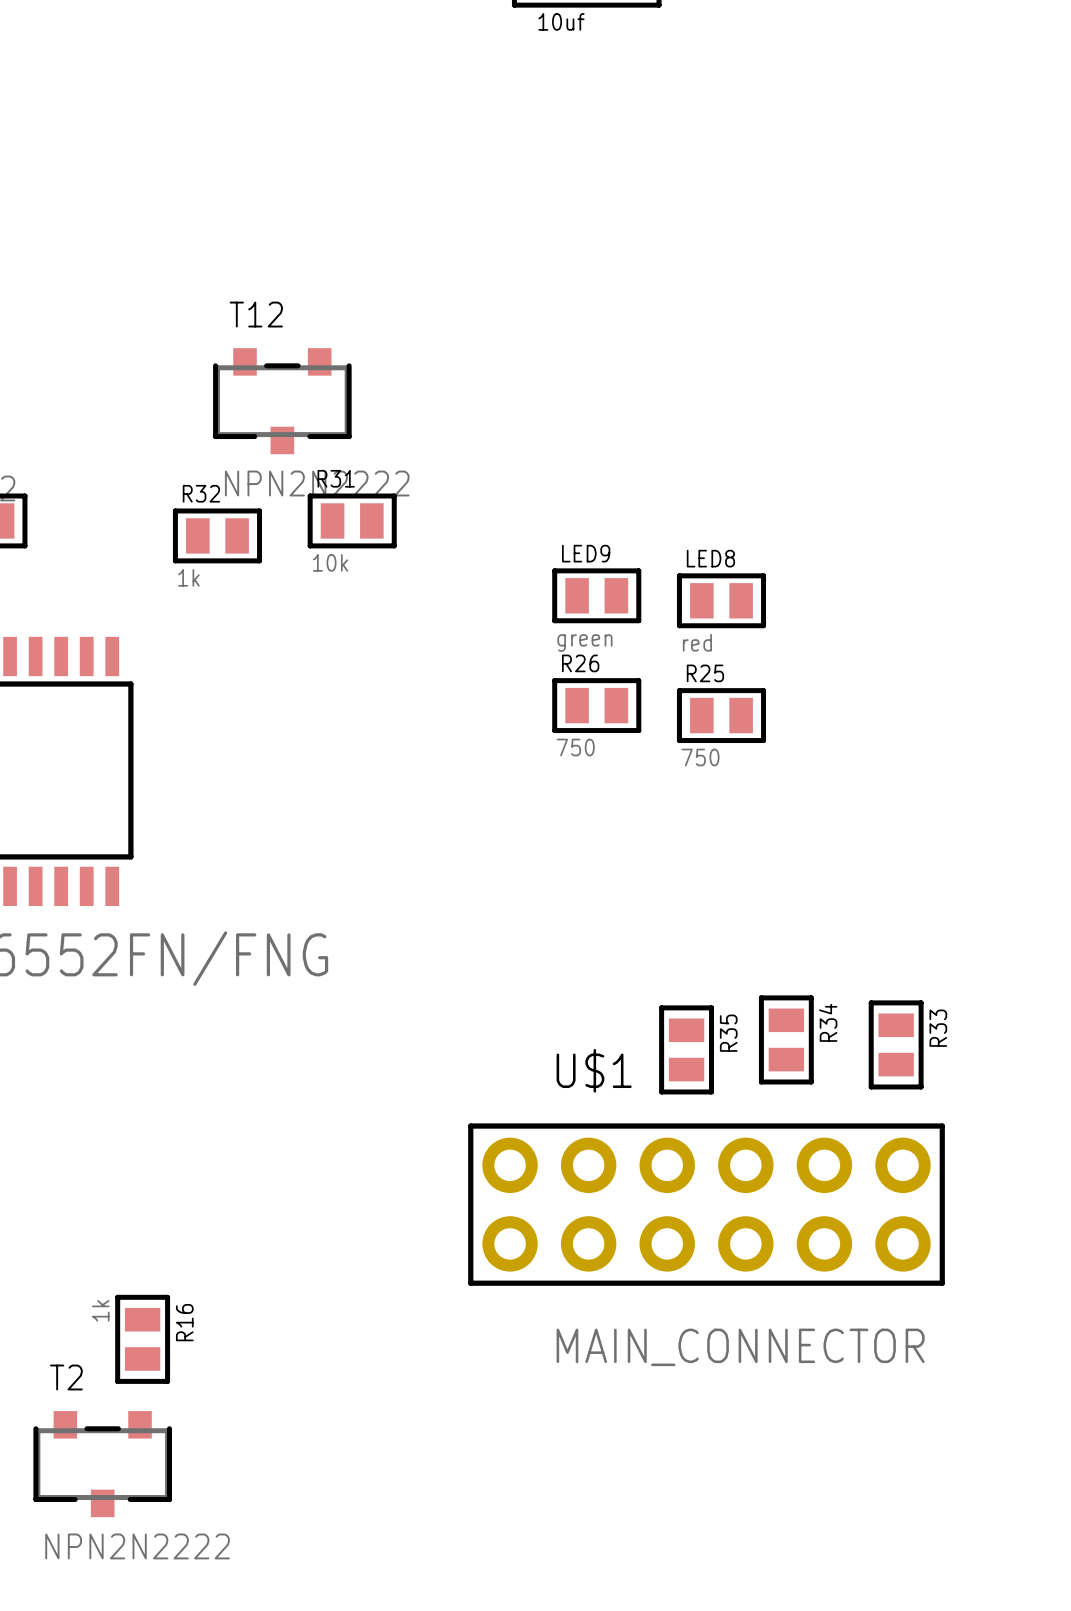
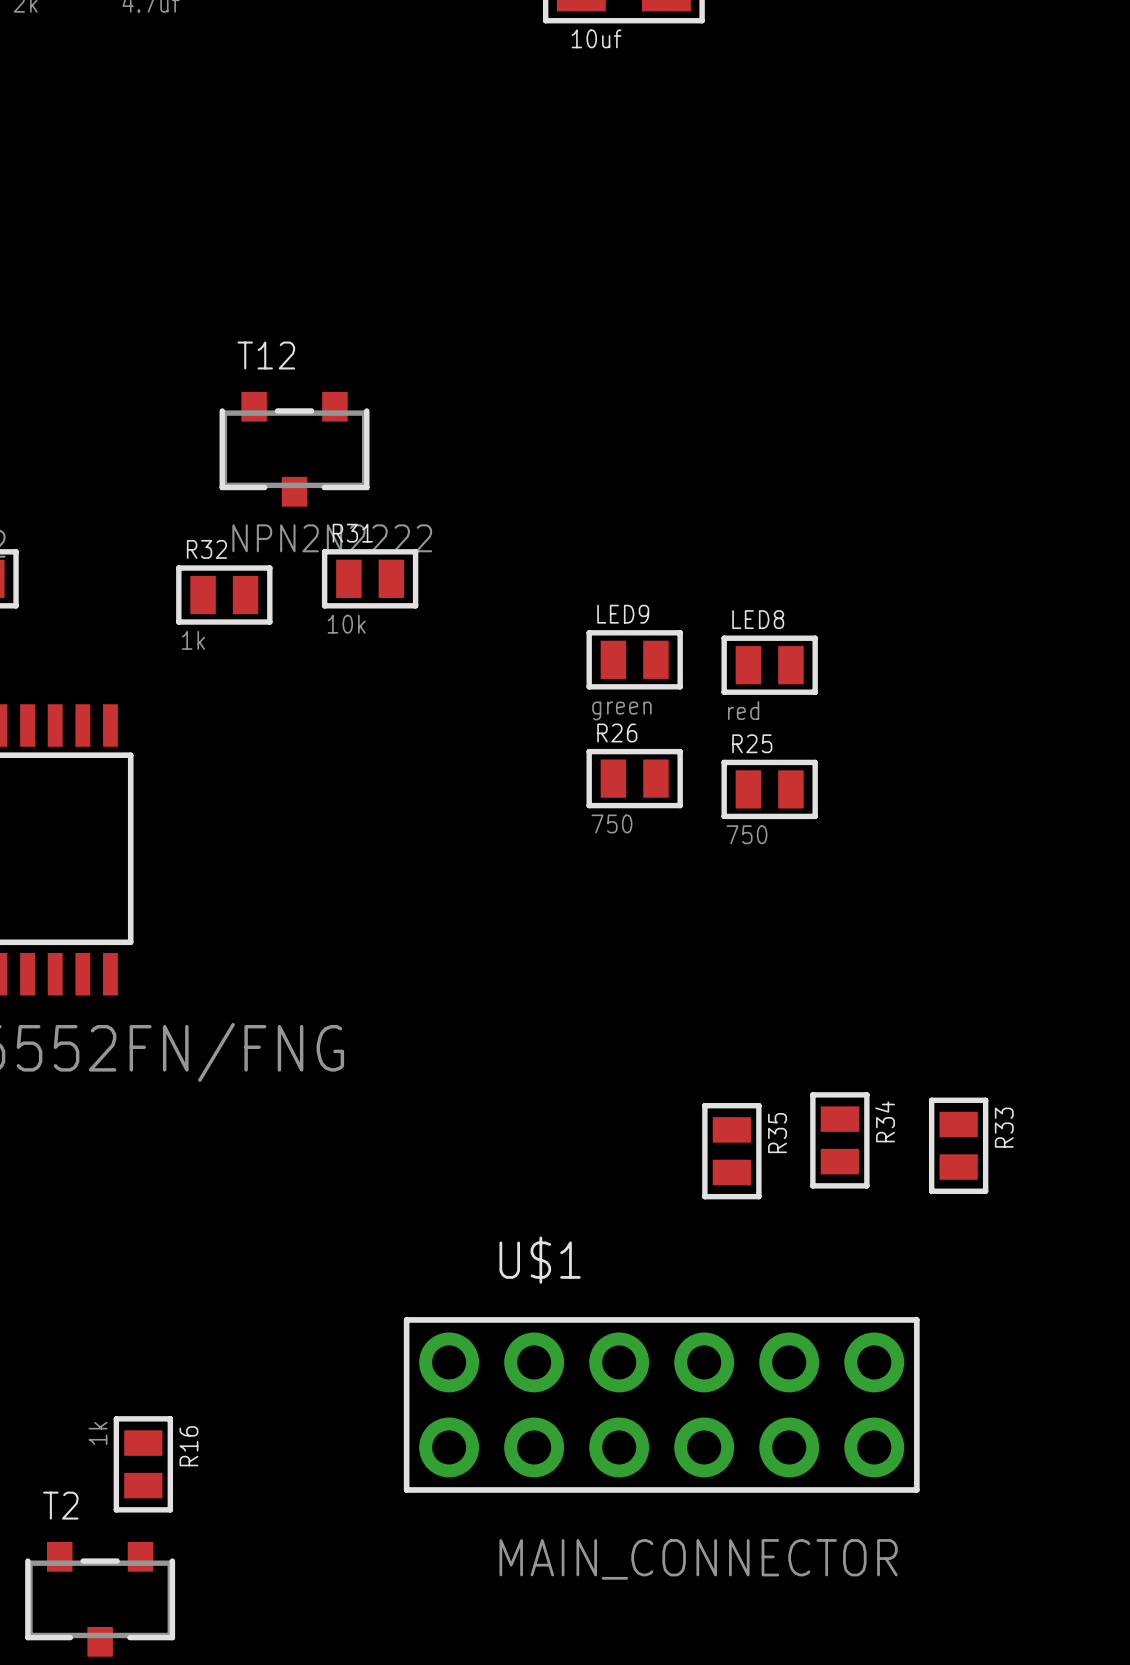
U$1 position: (706, 1204) -> (661, 1404)

